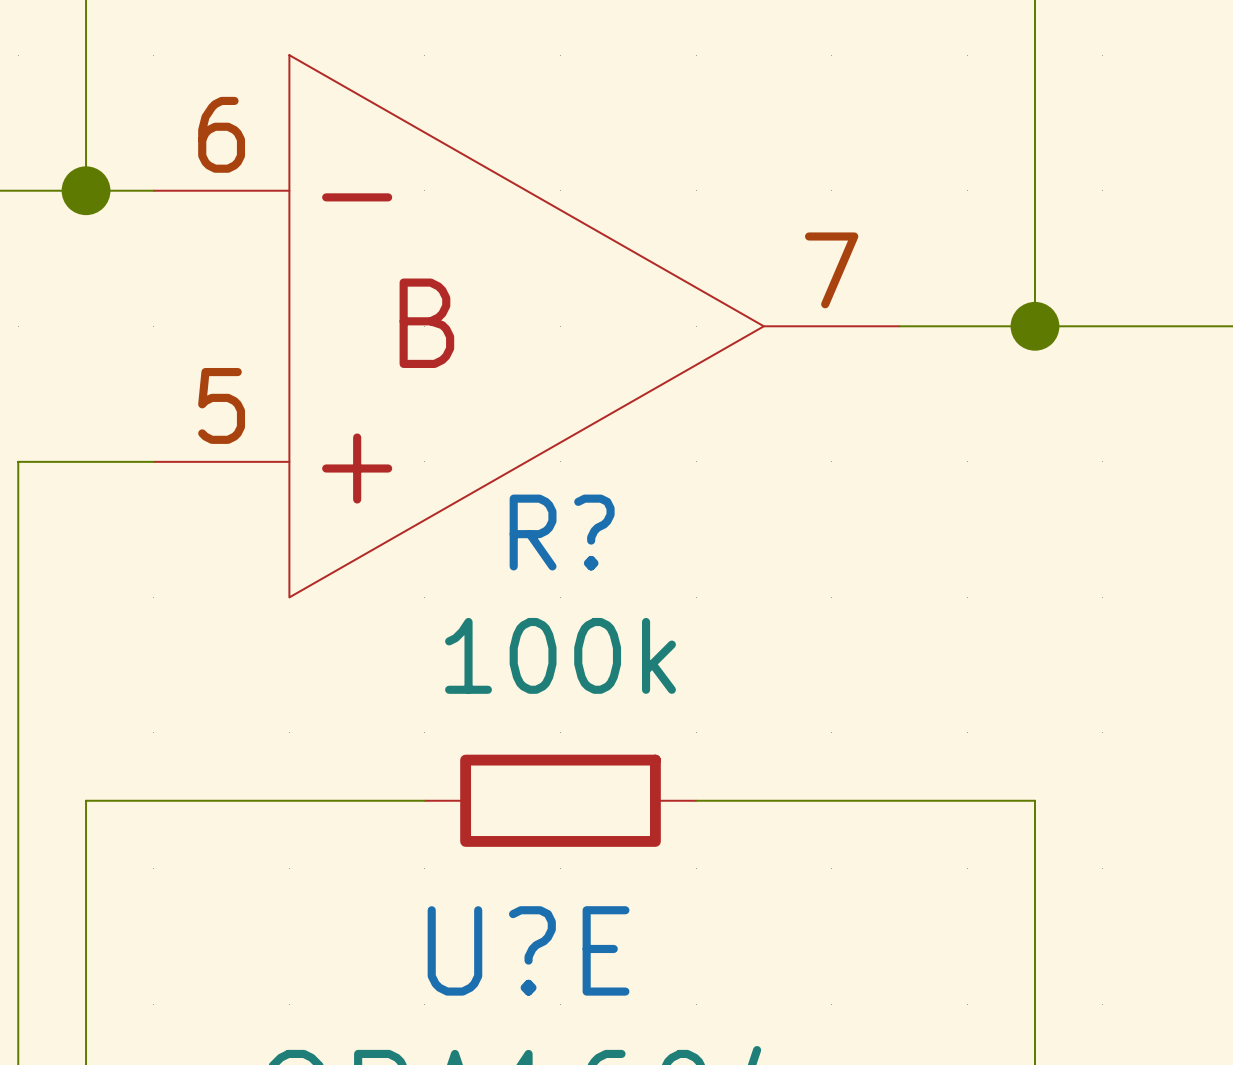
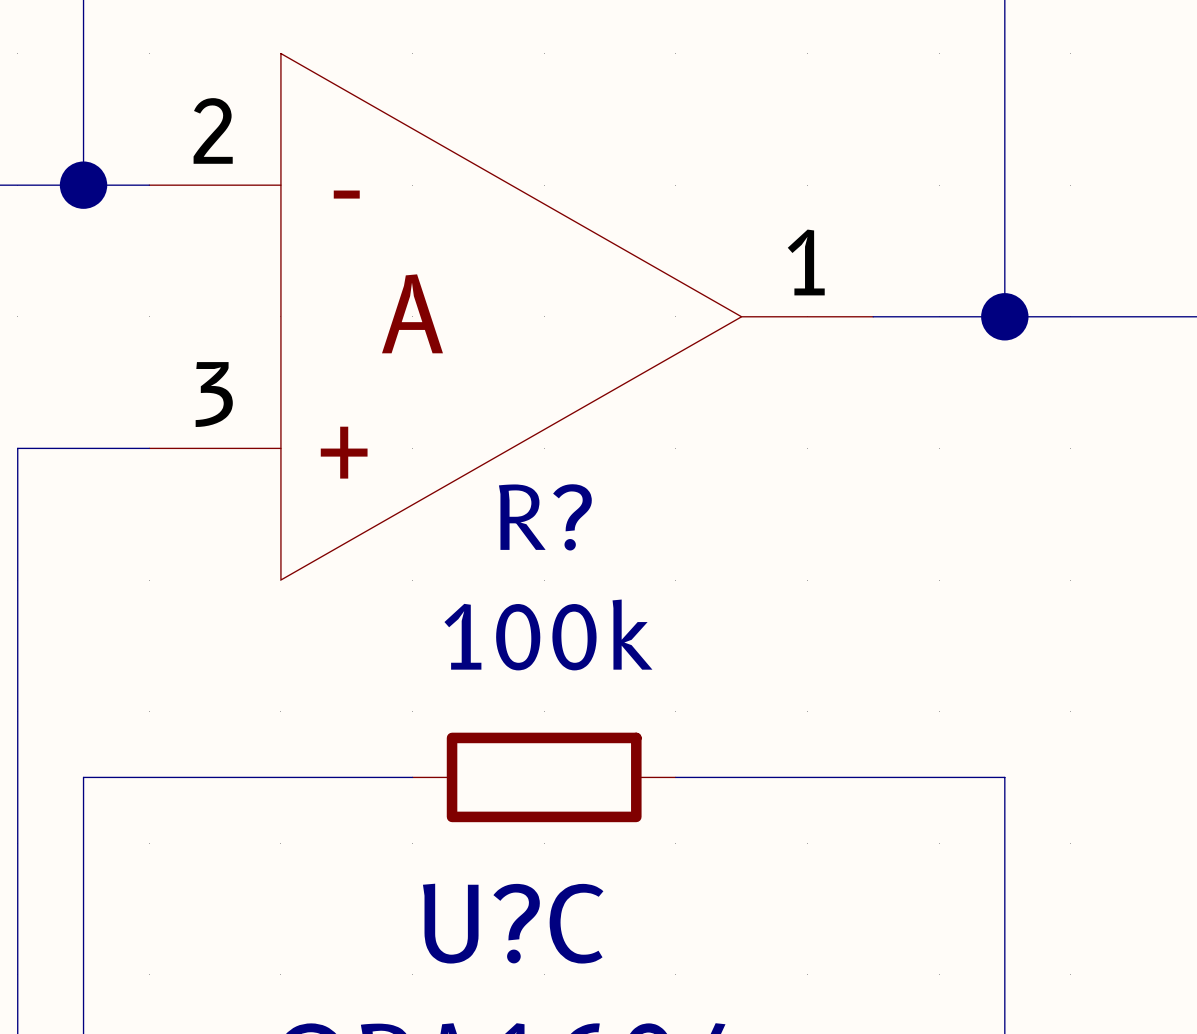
part pin number: 6 (221, 134) -> 2 (213, 130)
part pin number: 7 (831, 270) -> 1 (806, 262)
part text: B (426, 323) -> A (412, 313)
part pin number: 5 (221, 405) -> 3 (214, 394)
U?E name: U?E (528, 950) -> U?C (513, 923)

